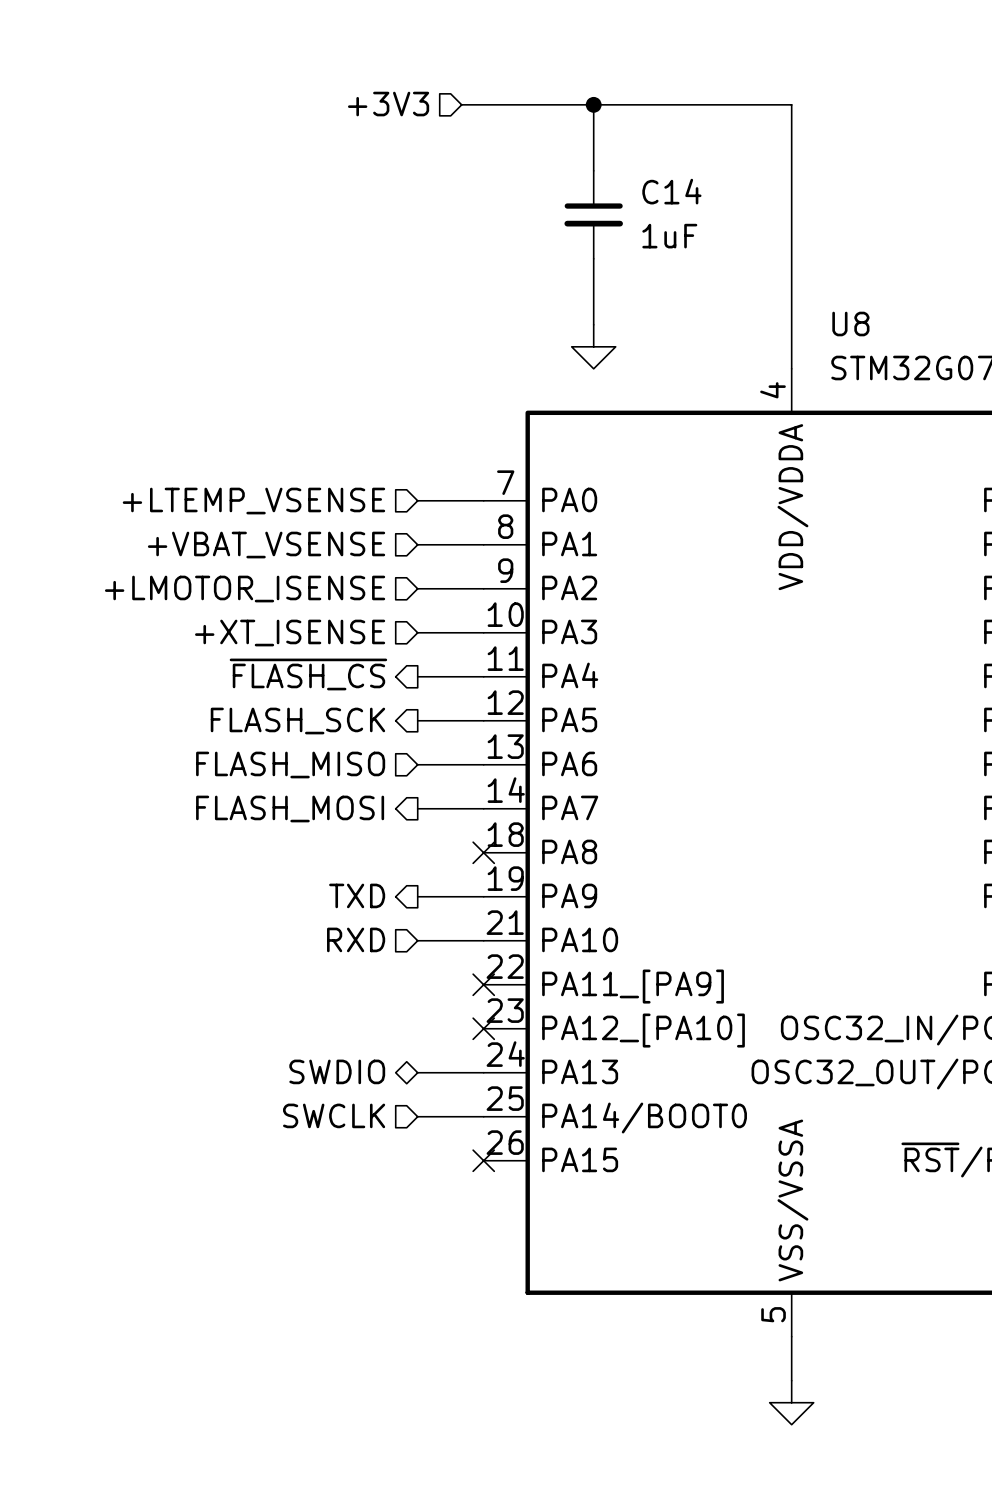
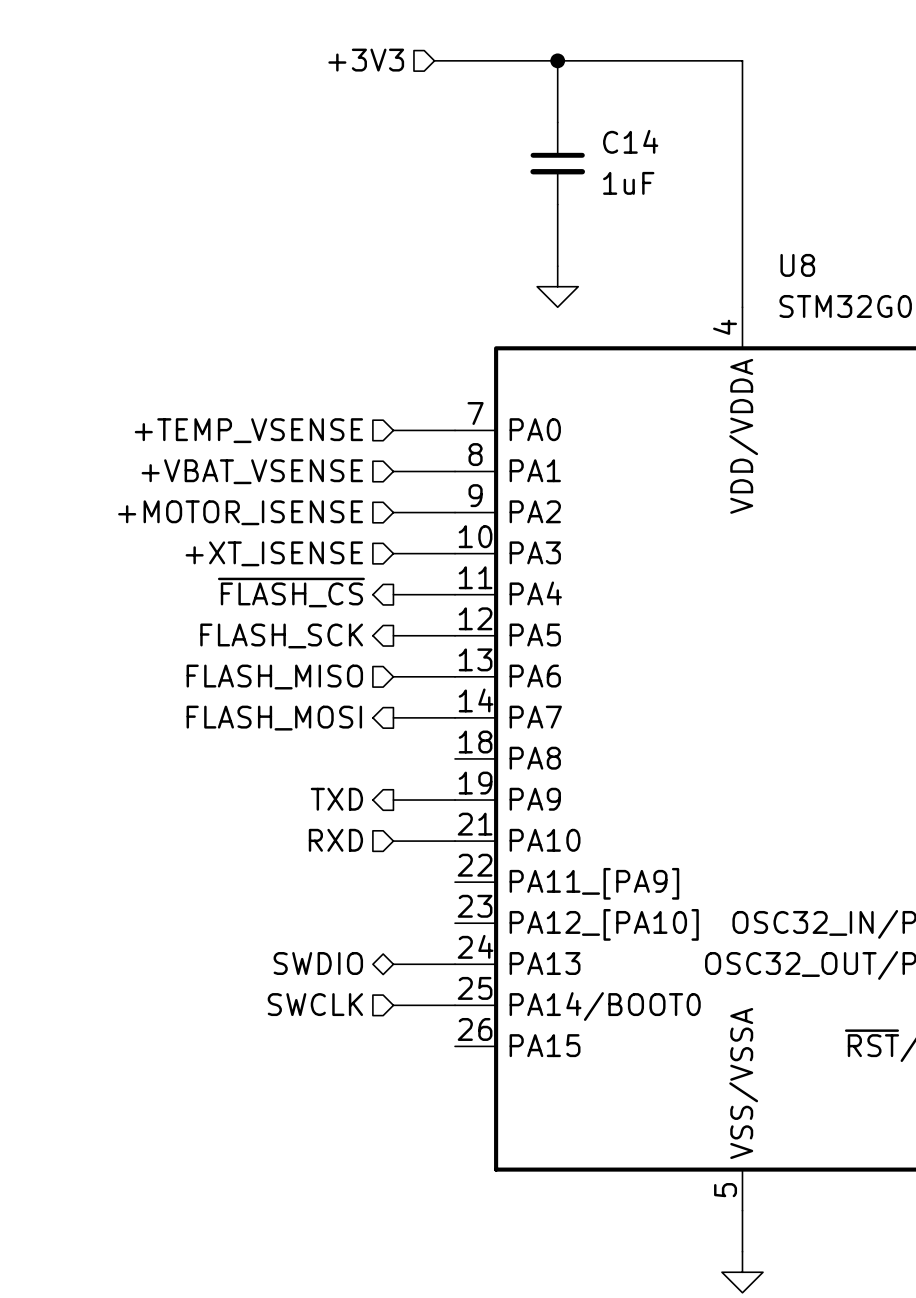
hierarchical label: +LTEMP_VSENSE (253, 501) -> +TEMP_VSENSE (248, 430)
hierarchical label: +LMOTOR_ISENSE (245, 589) -> +MOTOR_ISENSE (240, 512)
no-connect mark: (483, 852) -> none
no-connect mark: (483, 984) -> none
no-connect mark: (483, 1028) -> none
no-connect mark: (483, 1160) -> none

